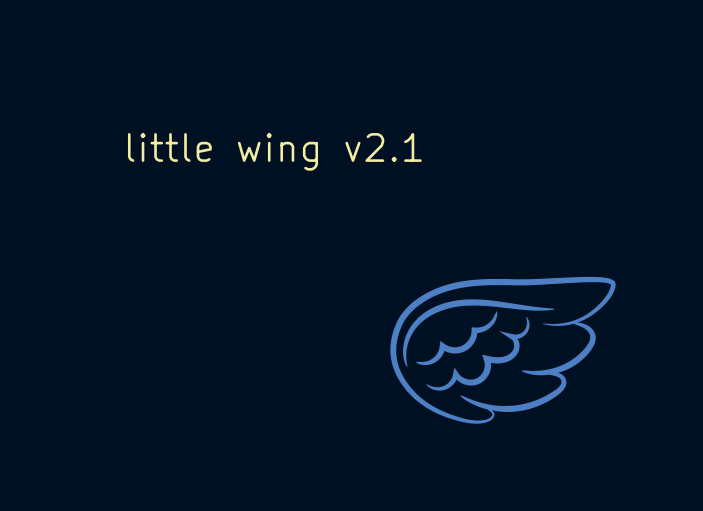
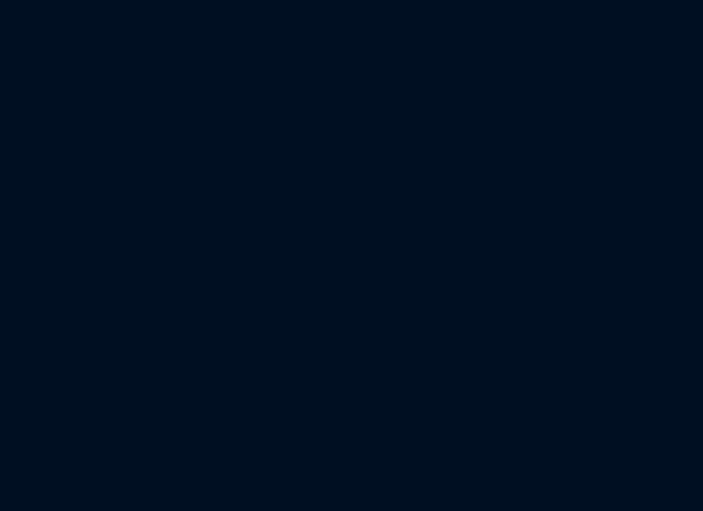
text: little wing v2.1 (274, 151) -> none
drawing: [390, 276, 616, 424] -> none

